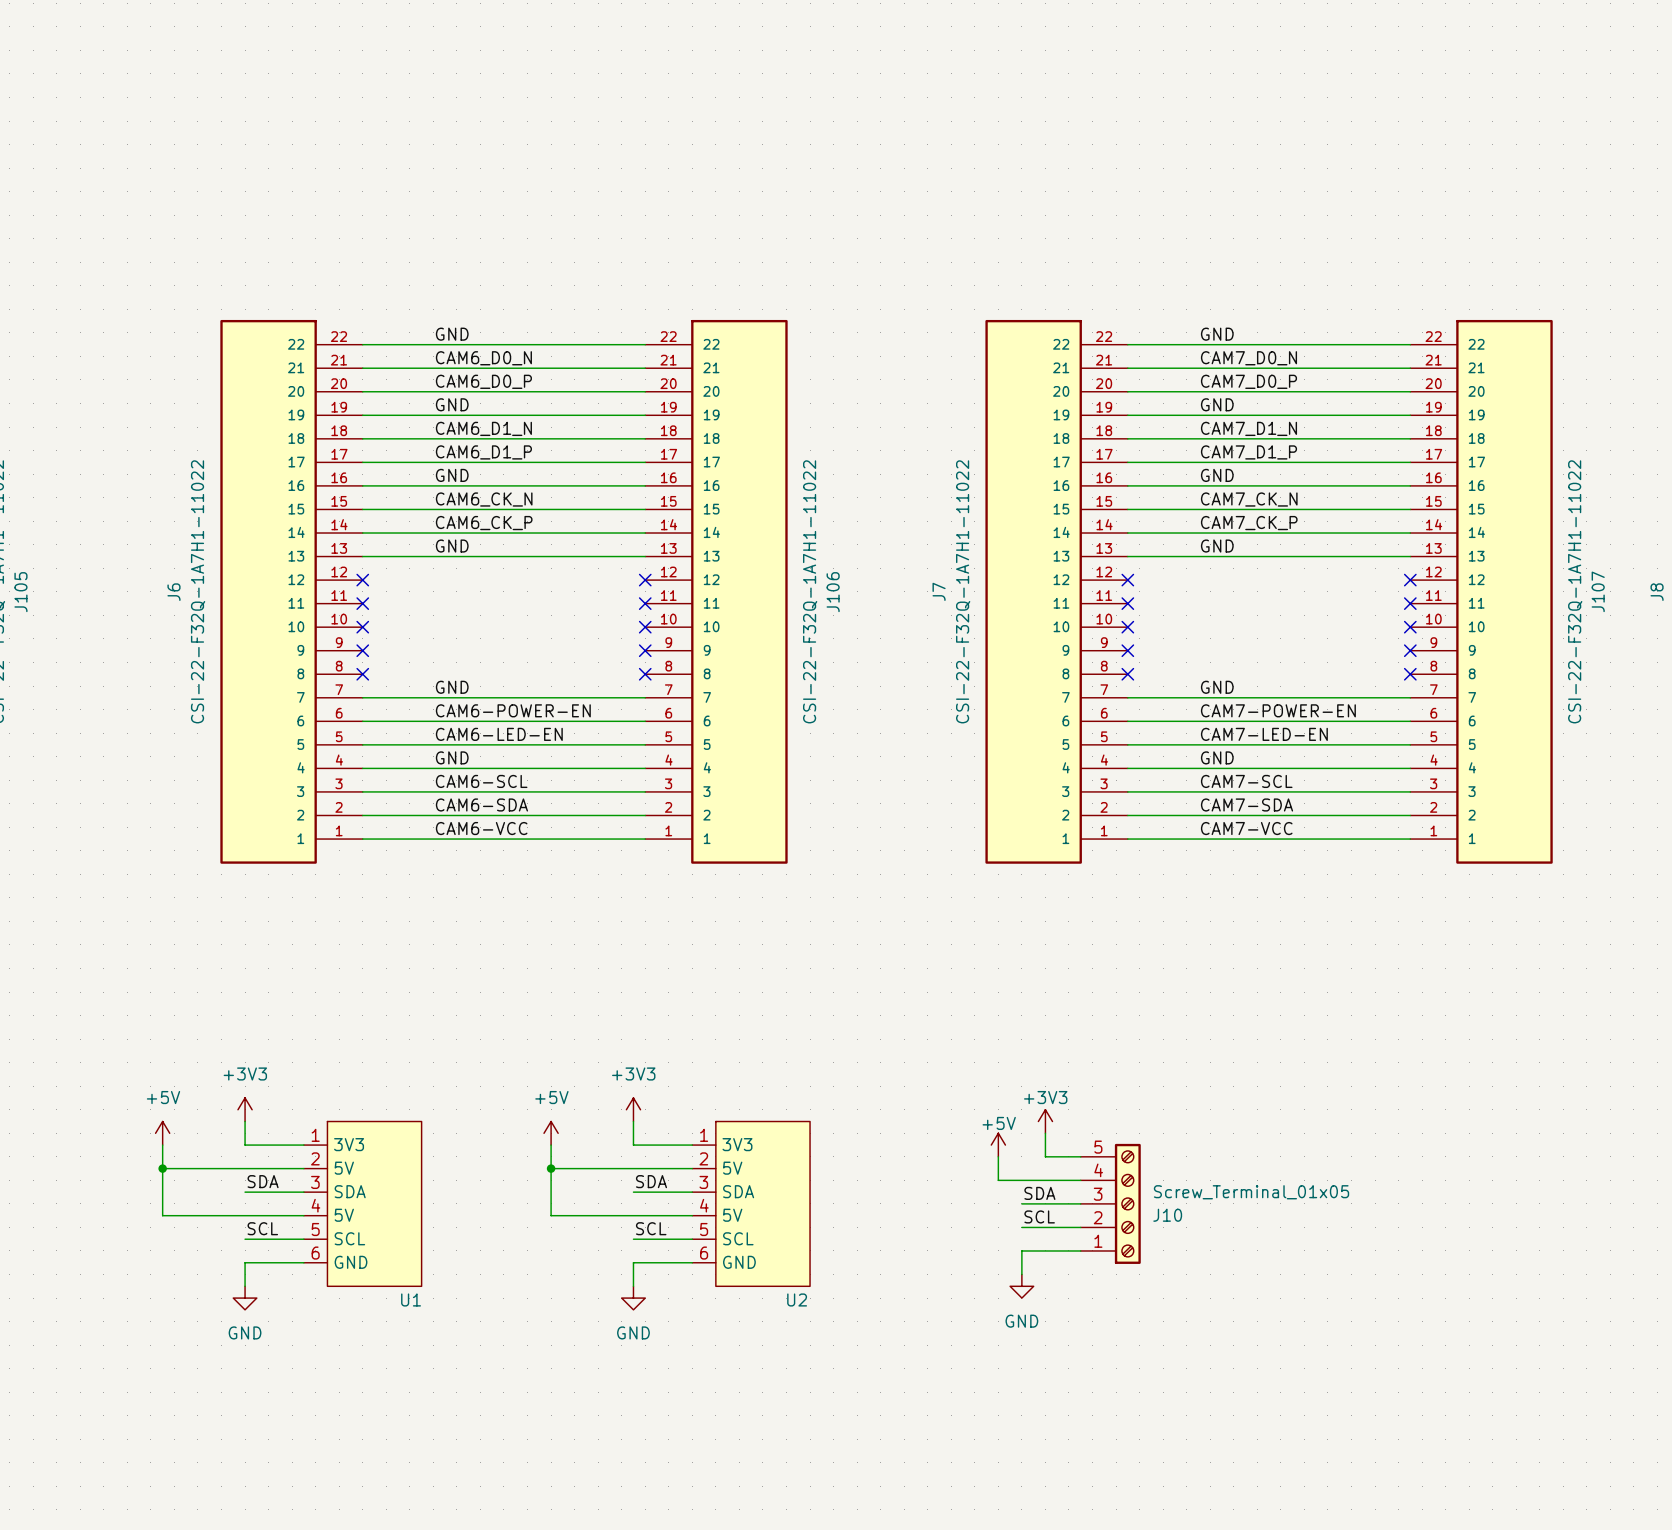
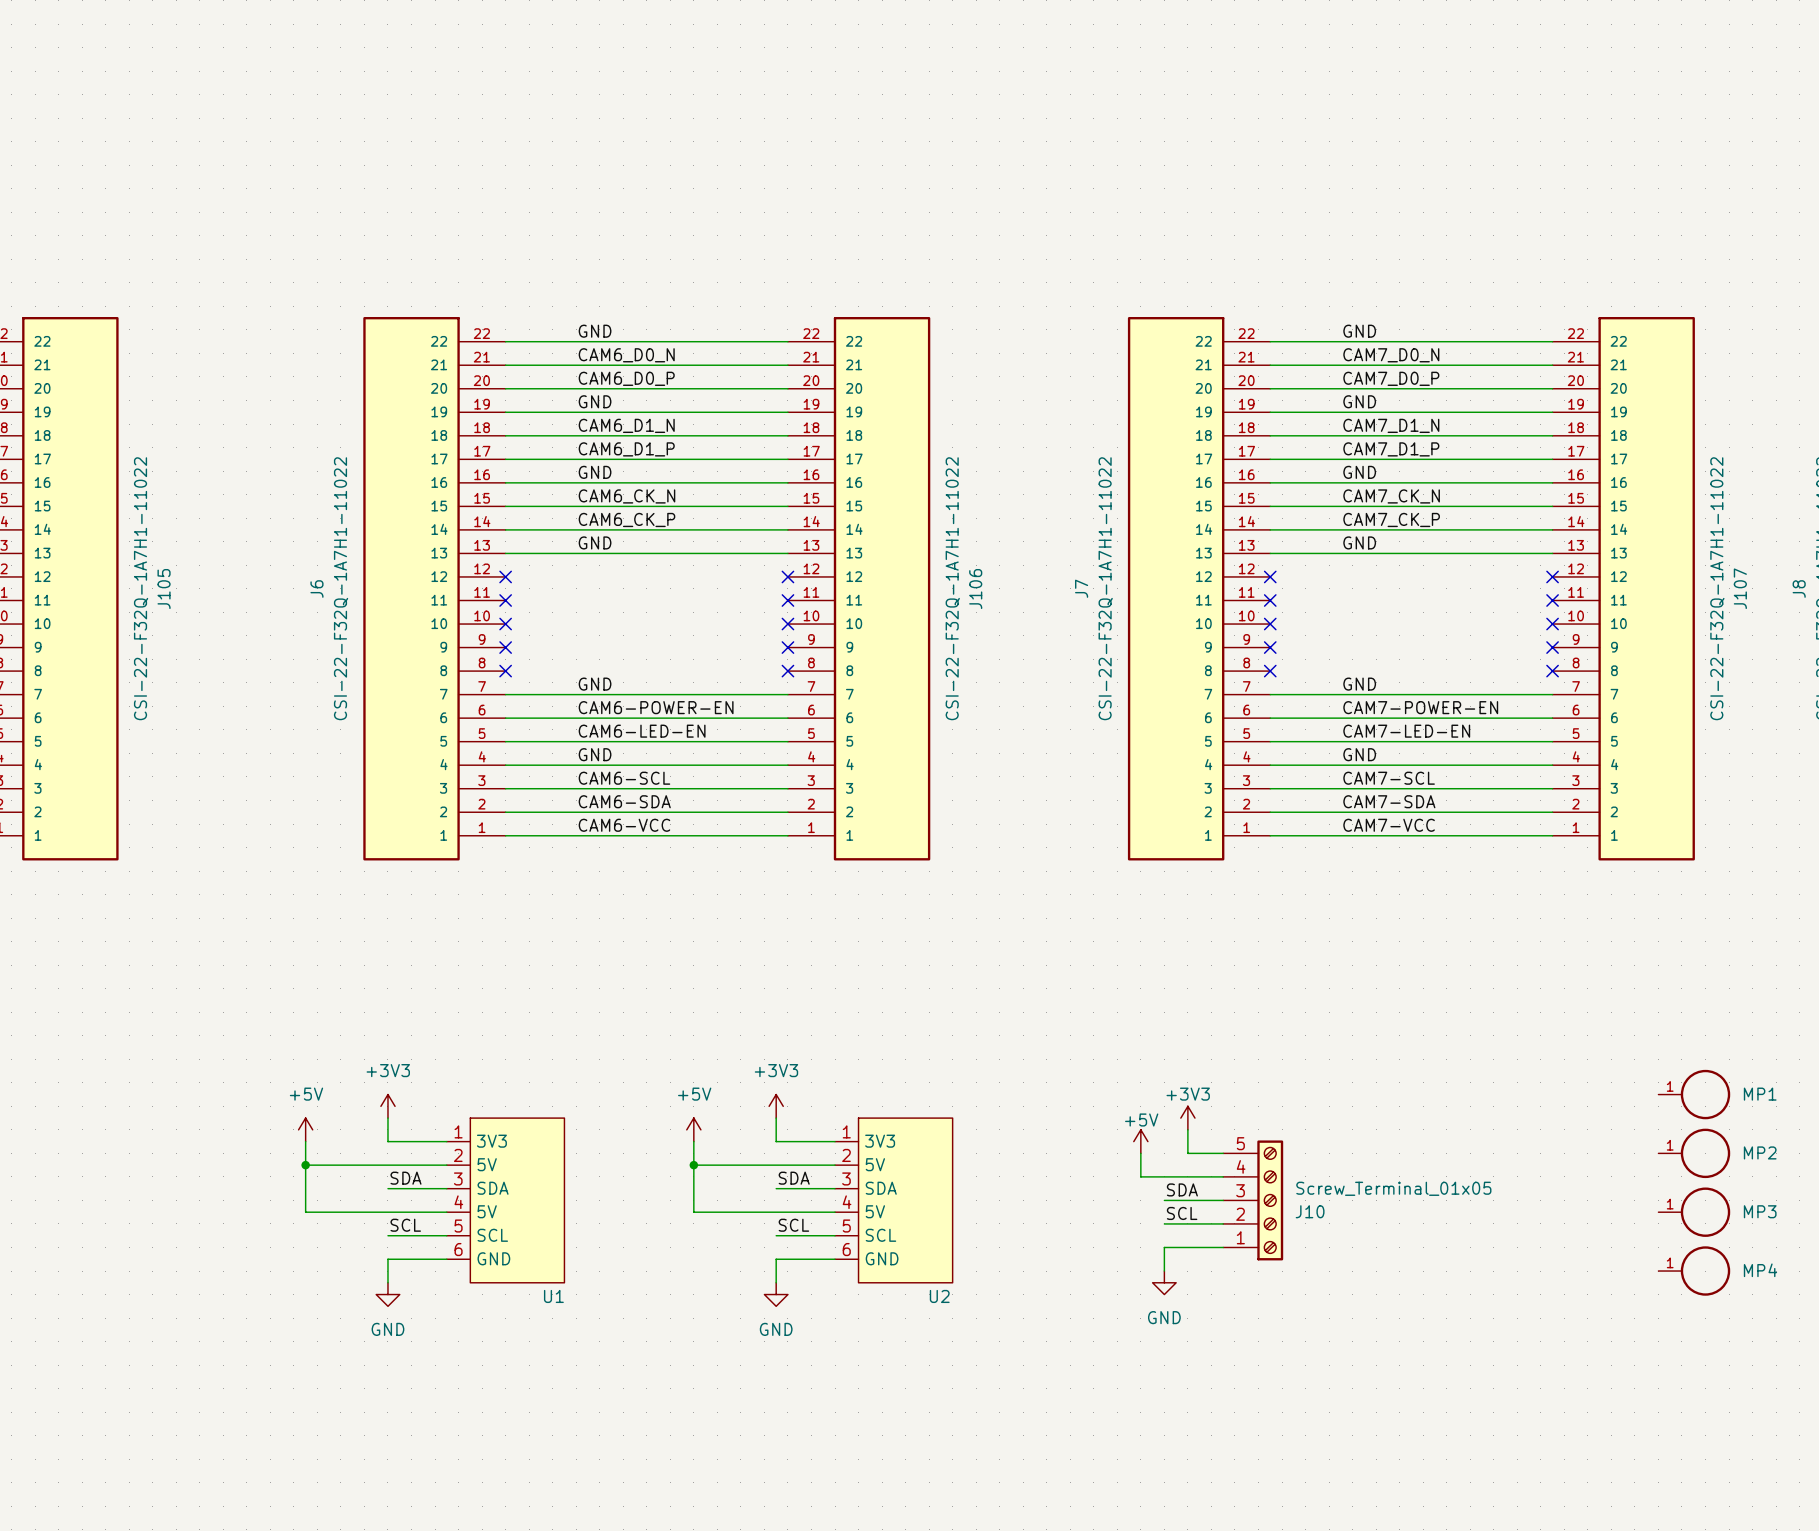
MP1: none -> (1694, 1094)
MP2: none -> (1694, 1153)
MP3: none -> (1694, 1212)
MP4: none -> (1694, 1271)

